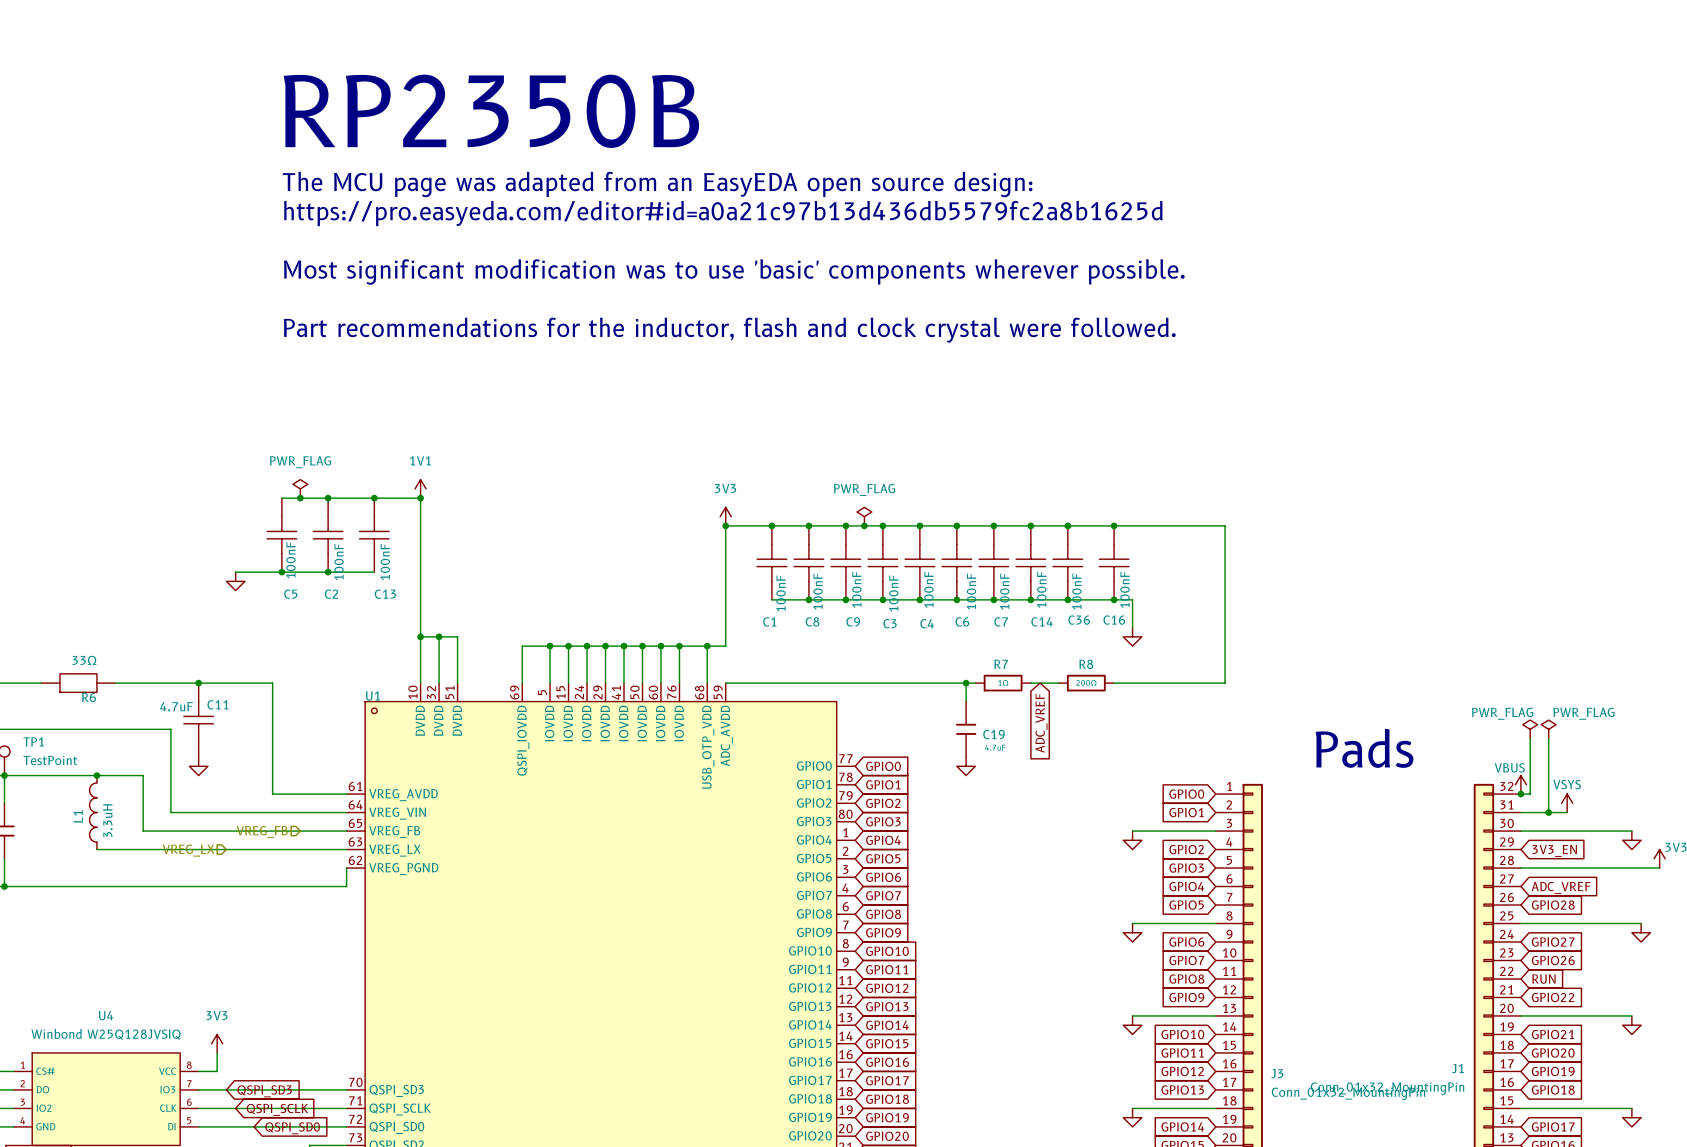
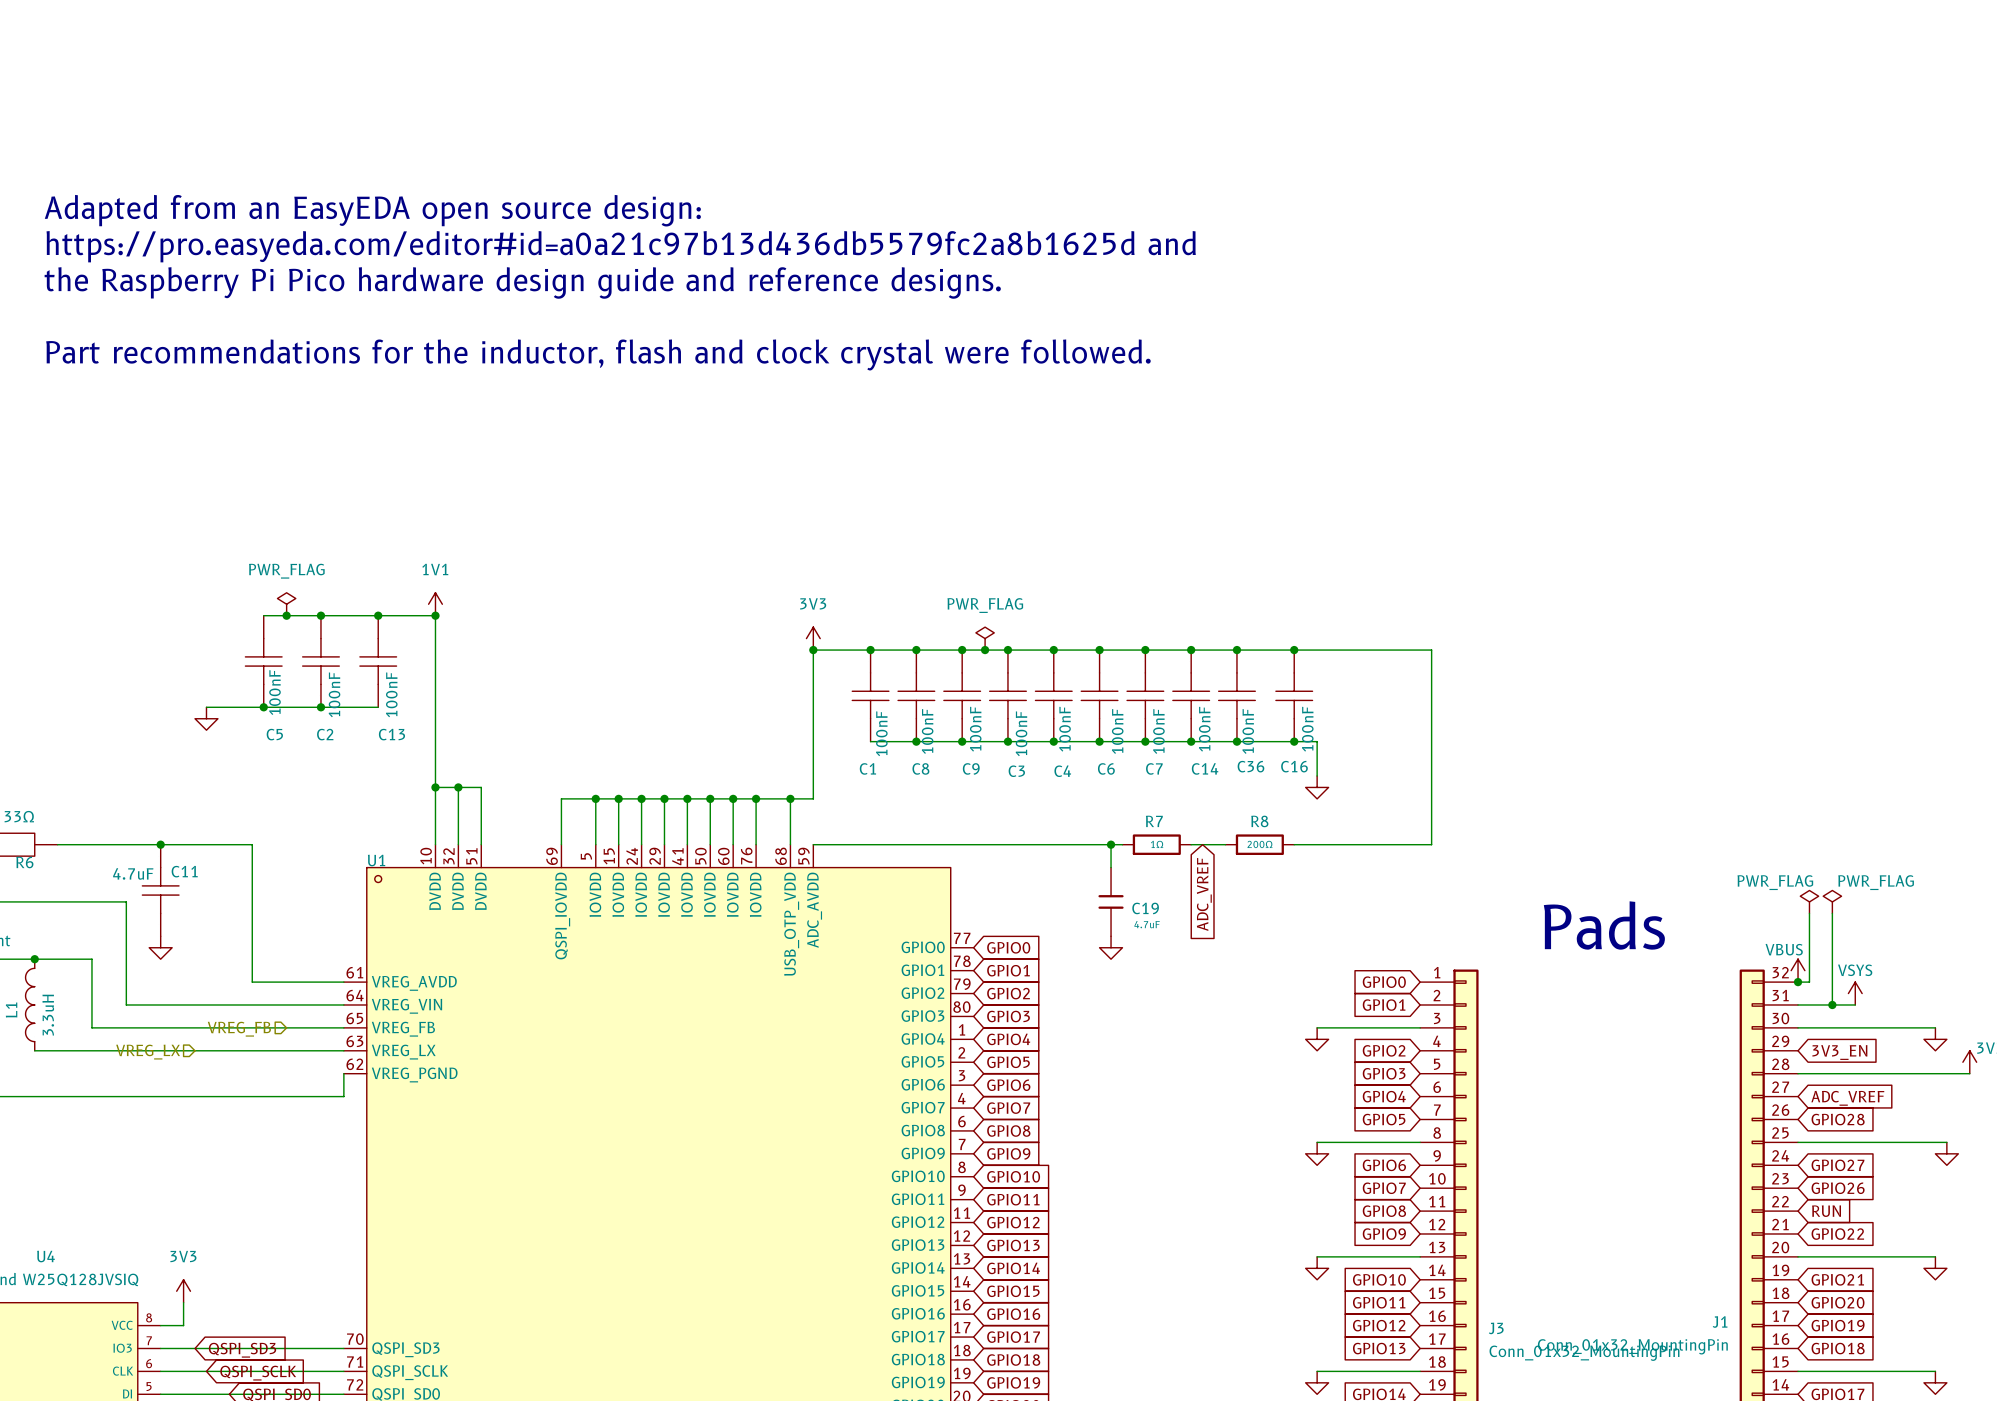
text: RP2350B (491, 111) -> none
text: The MCU page was adapted from an EasyEDA open source design: (657, 184) -> Adapted from an EasyEDA open source design: (372, 210)
text: https://pro.easyeda.com/editor#id=a0a21c97b13d436db5579fc2a8b1625d (723, 213) -> https://pro.easyeda.com/editor#id=a0a21c97b13d436db5579fc2a8b1625d and (621, 246)
text: none -> the Raspberry Pi Pico hardware design guide and reference designs. (522, 282)
text: Most significant modification was to use 'basic' components wherever possible. (734, 272) -> none
text: none -> Part recommendations for the inductor, flash and clock crystal were followed. (598, 354)
text: Part recommendations for the inductor, flash and clock crystal were followed. (729, 330) -> none

